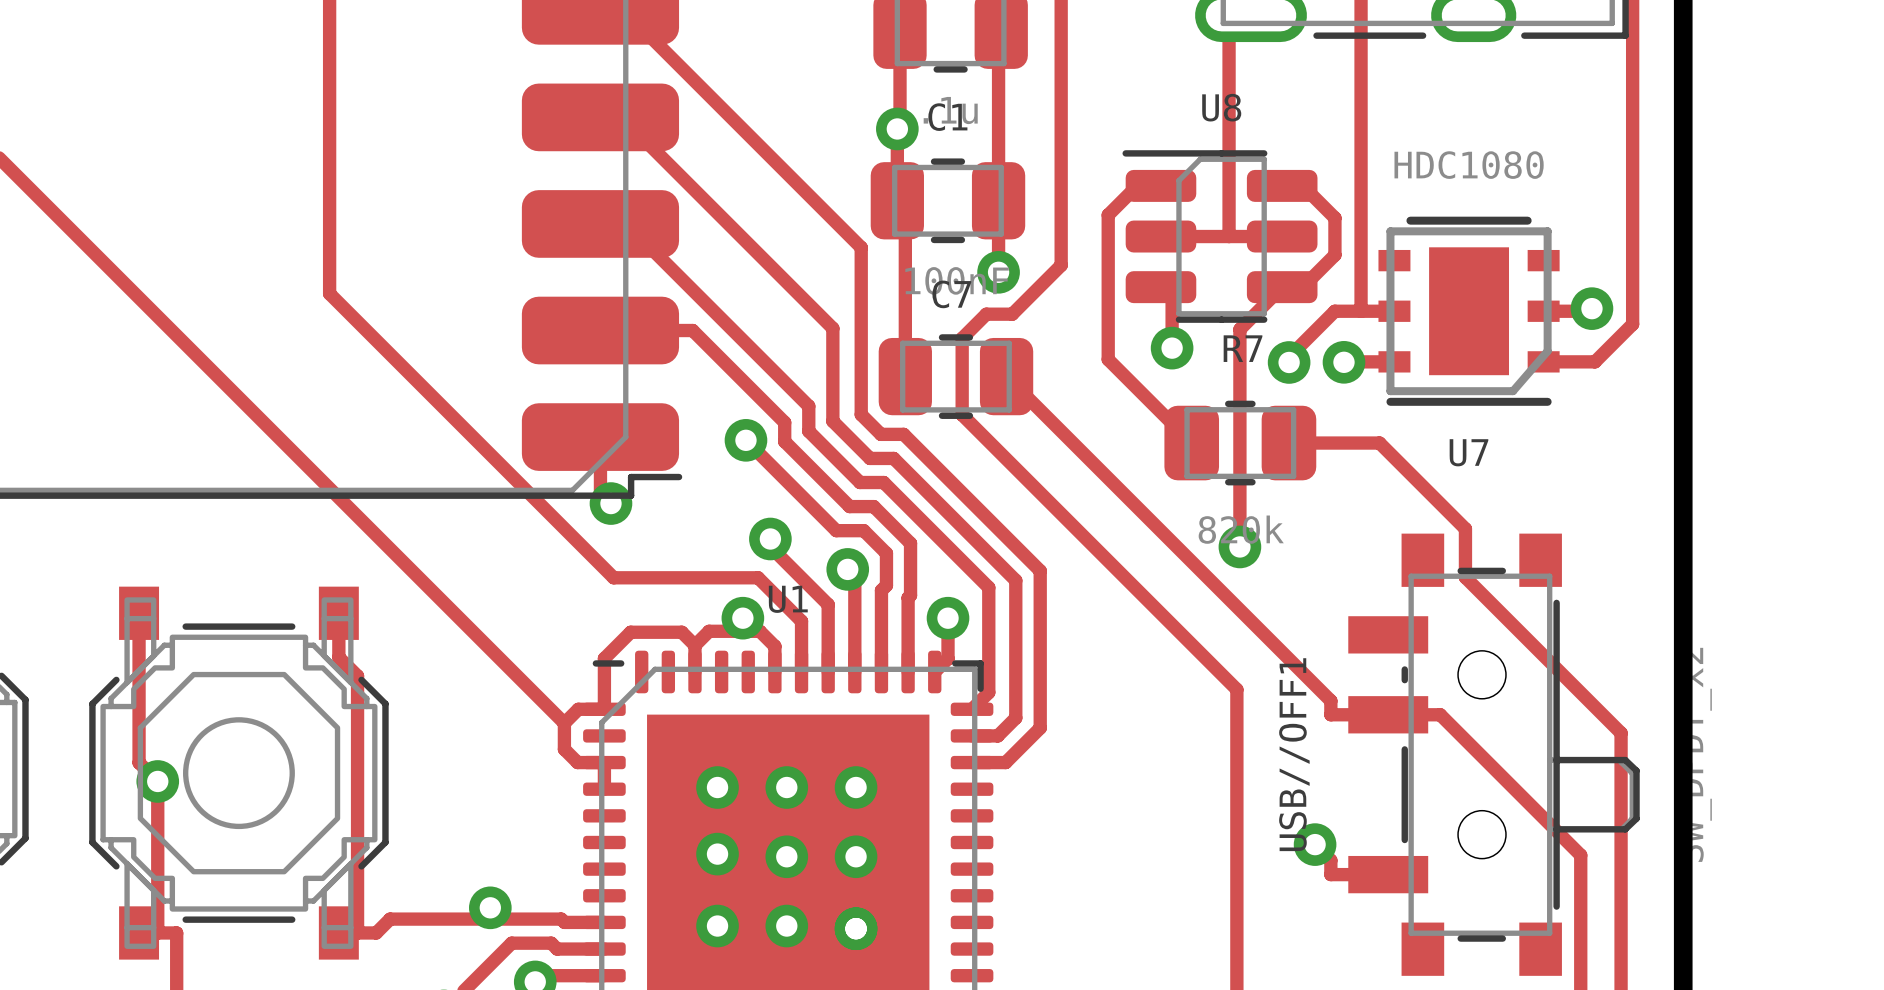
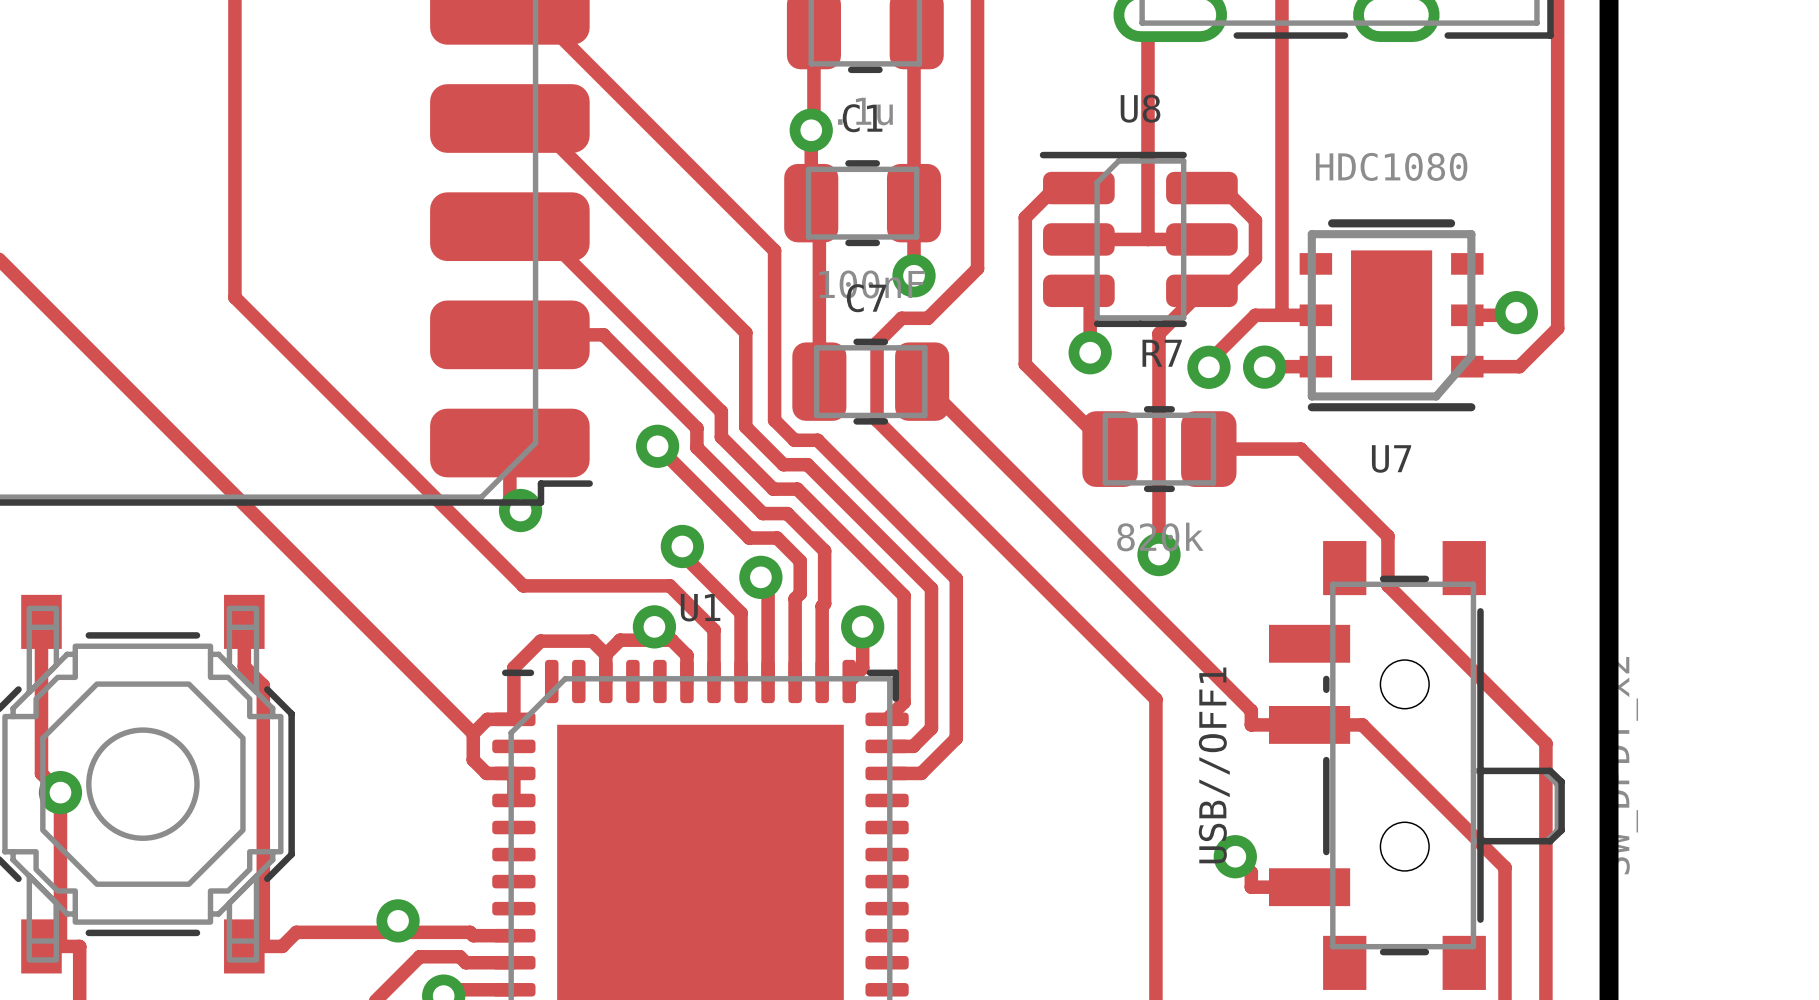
via: (717, 787) -> none
via: (786, 787) -> none
via: (856, 787) -> none
via: (717, 854) -> none
via: (786, 856) -> none
via: (856, 856) -> none
via: (717, 926) -> none
via: (786, 926) -> none
via: (856, 928) -> none

